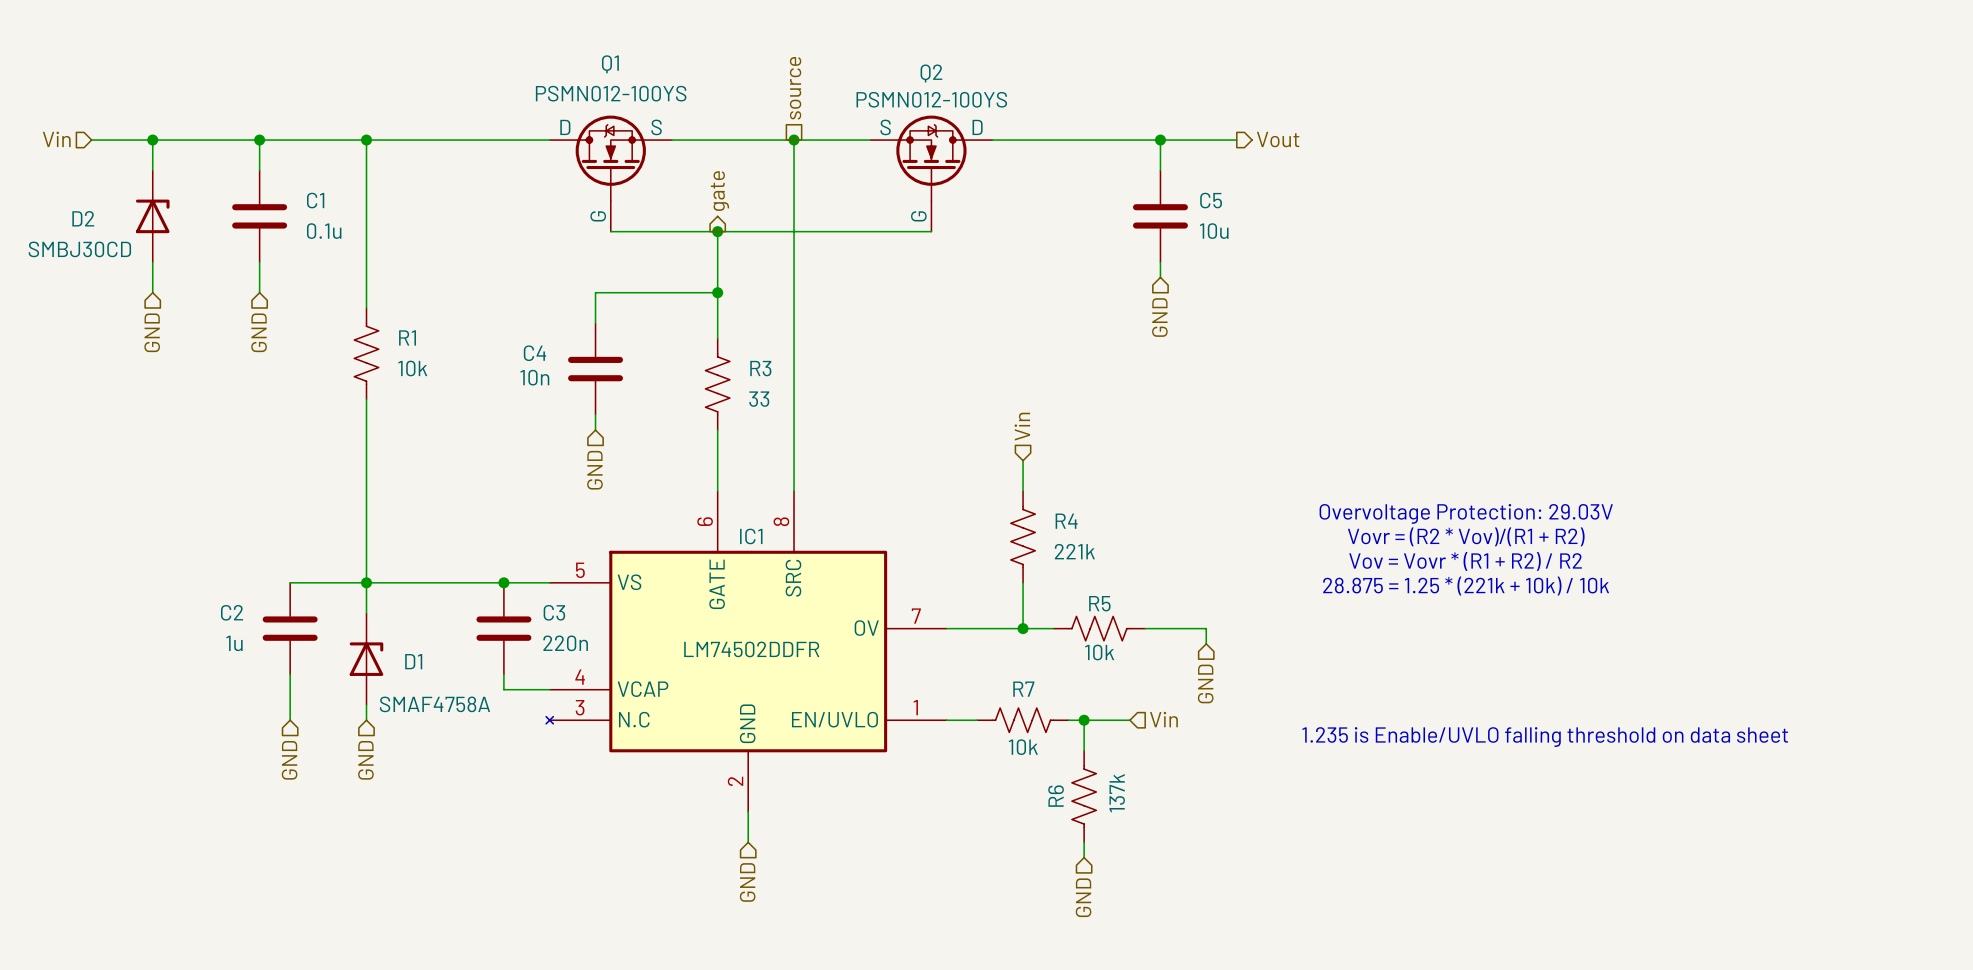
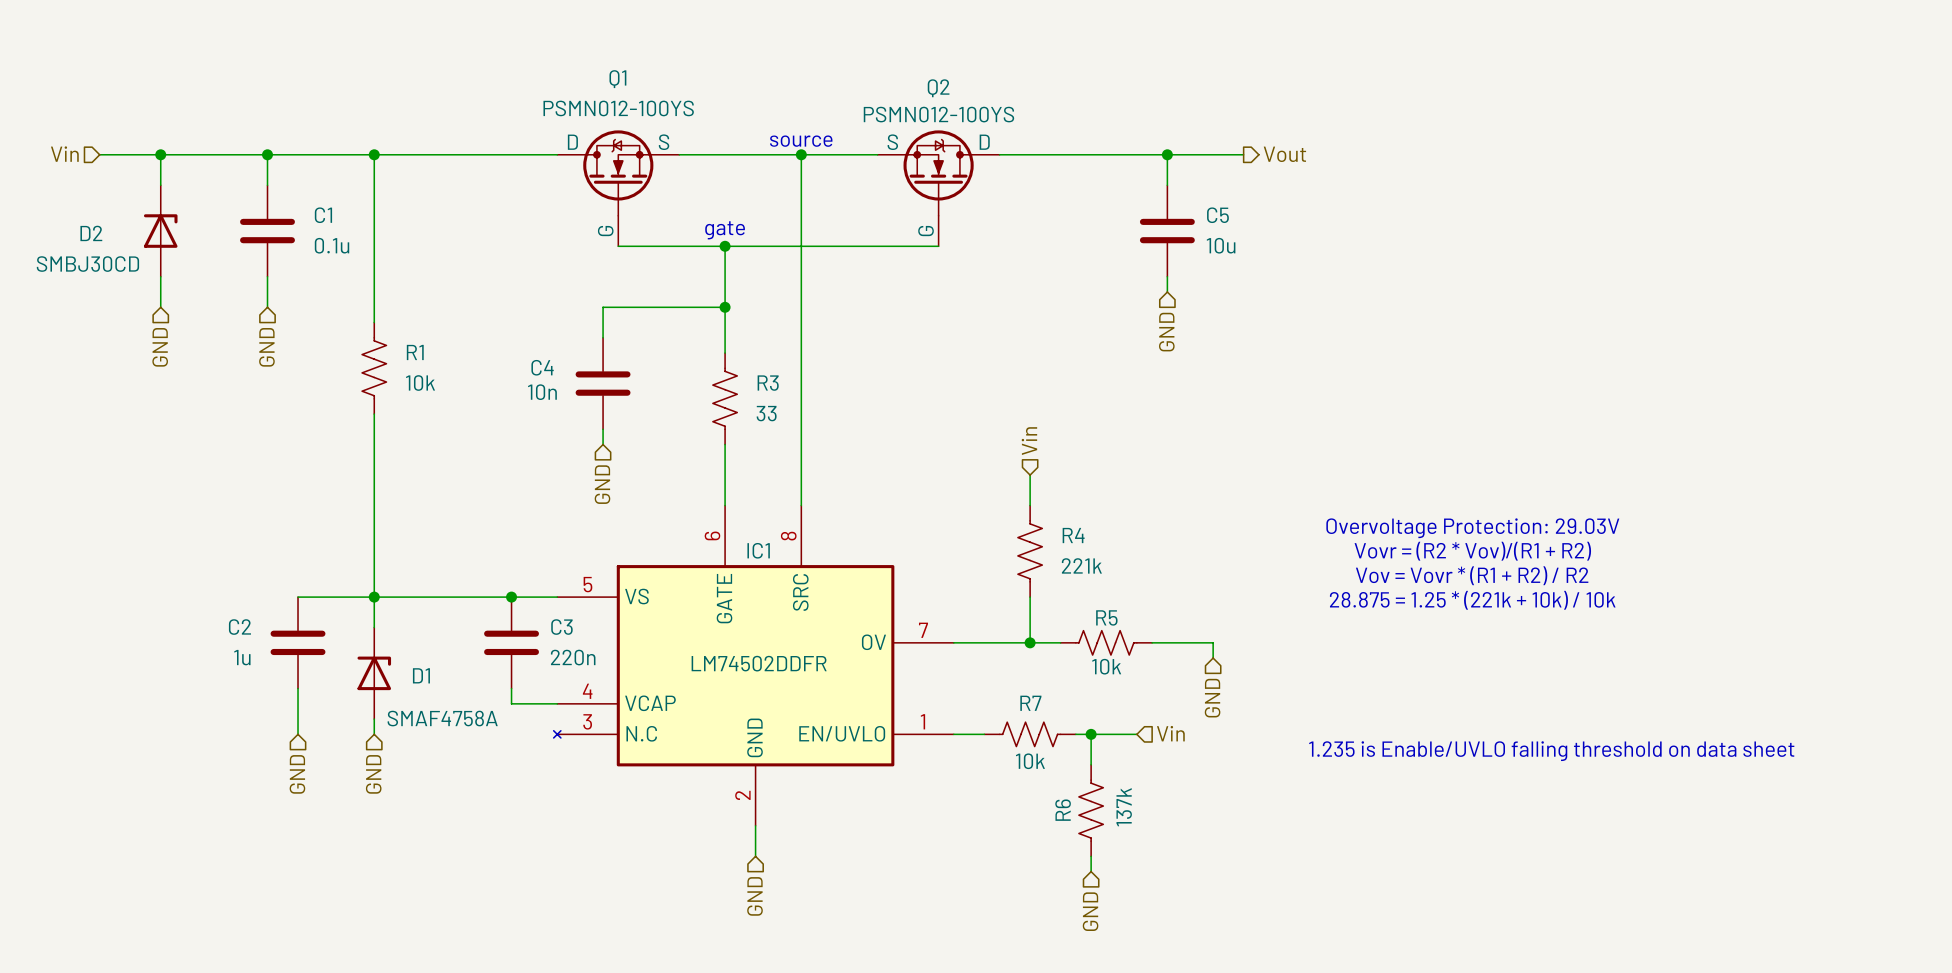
hierarchical label: source (795, 88) -> none
text: none -> source (801, 141)
hierarchical label: gate (719, 191) -> none
text: none -> gate (725, 230)

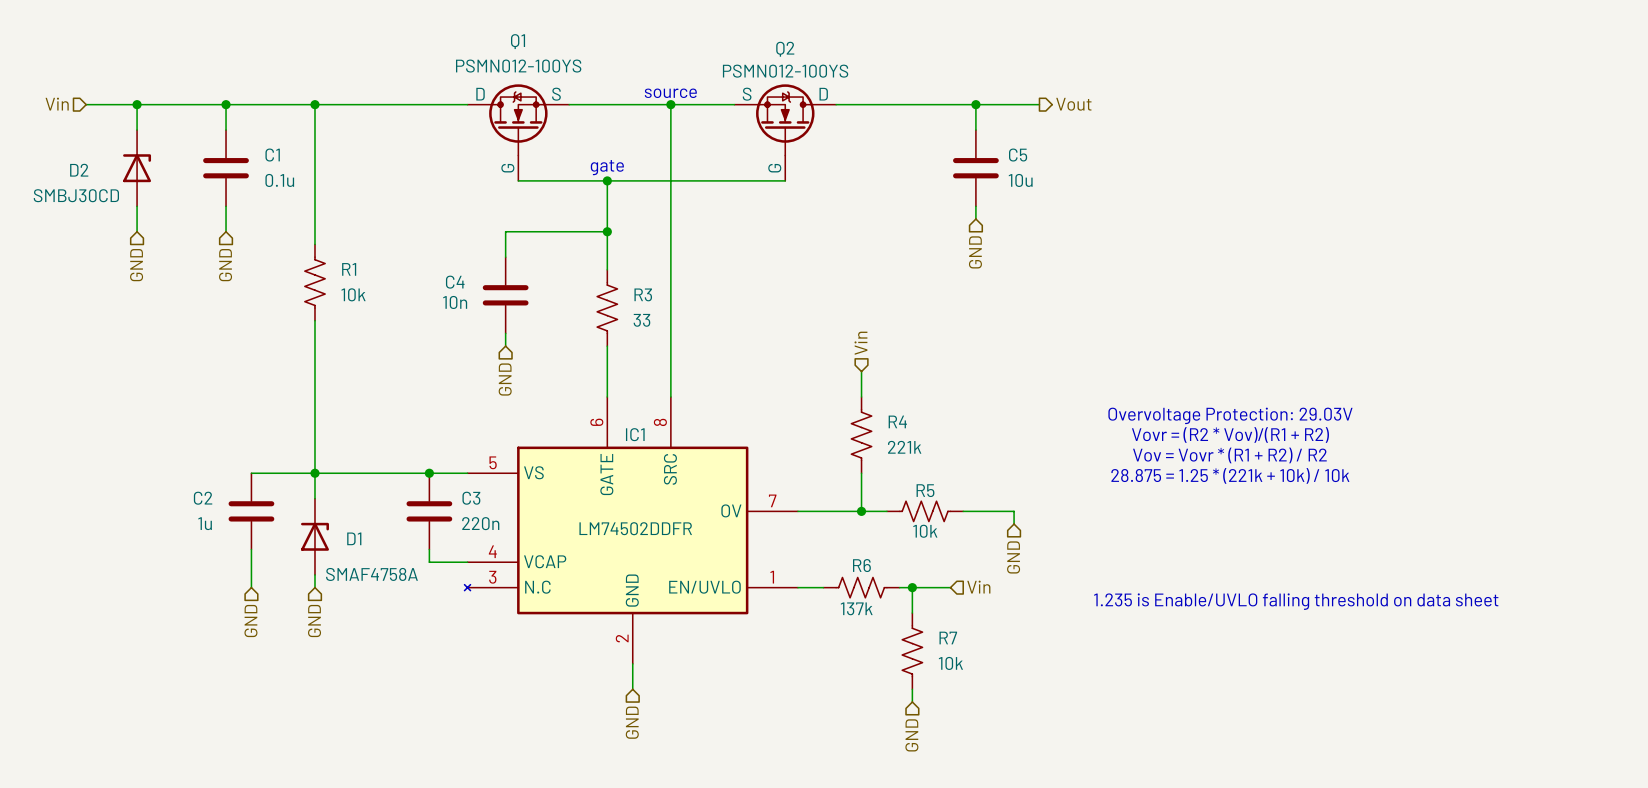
R7 name: R7 (1030, 703) -> R6 (861, 565)
R7 value: 10k (1030, 761) -> 137k (856, 608)
R6 value: 137k (1124, 807) -> 10k (950, 663)
R6 name: R6 (1063, 810) -> R7 (948, 638)

